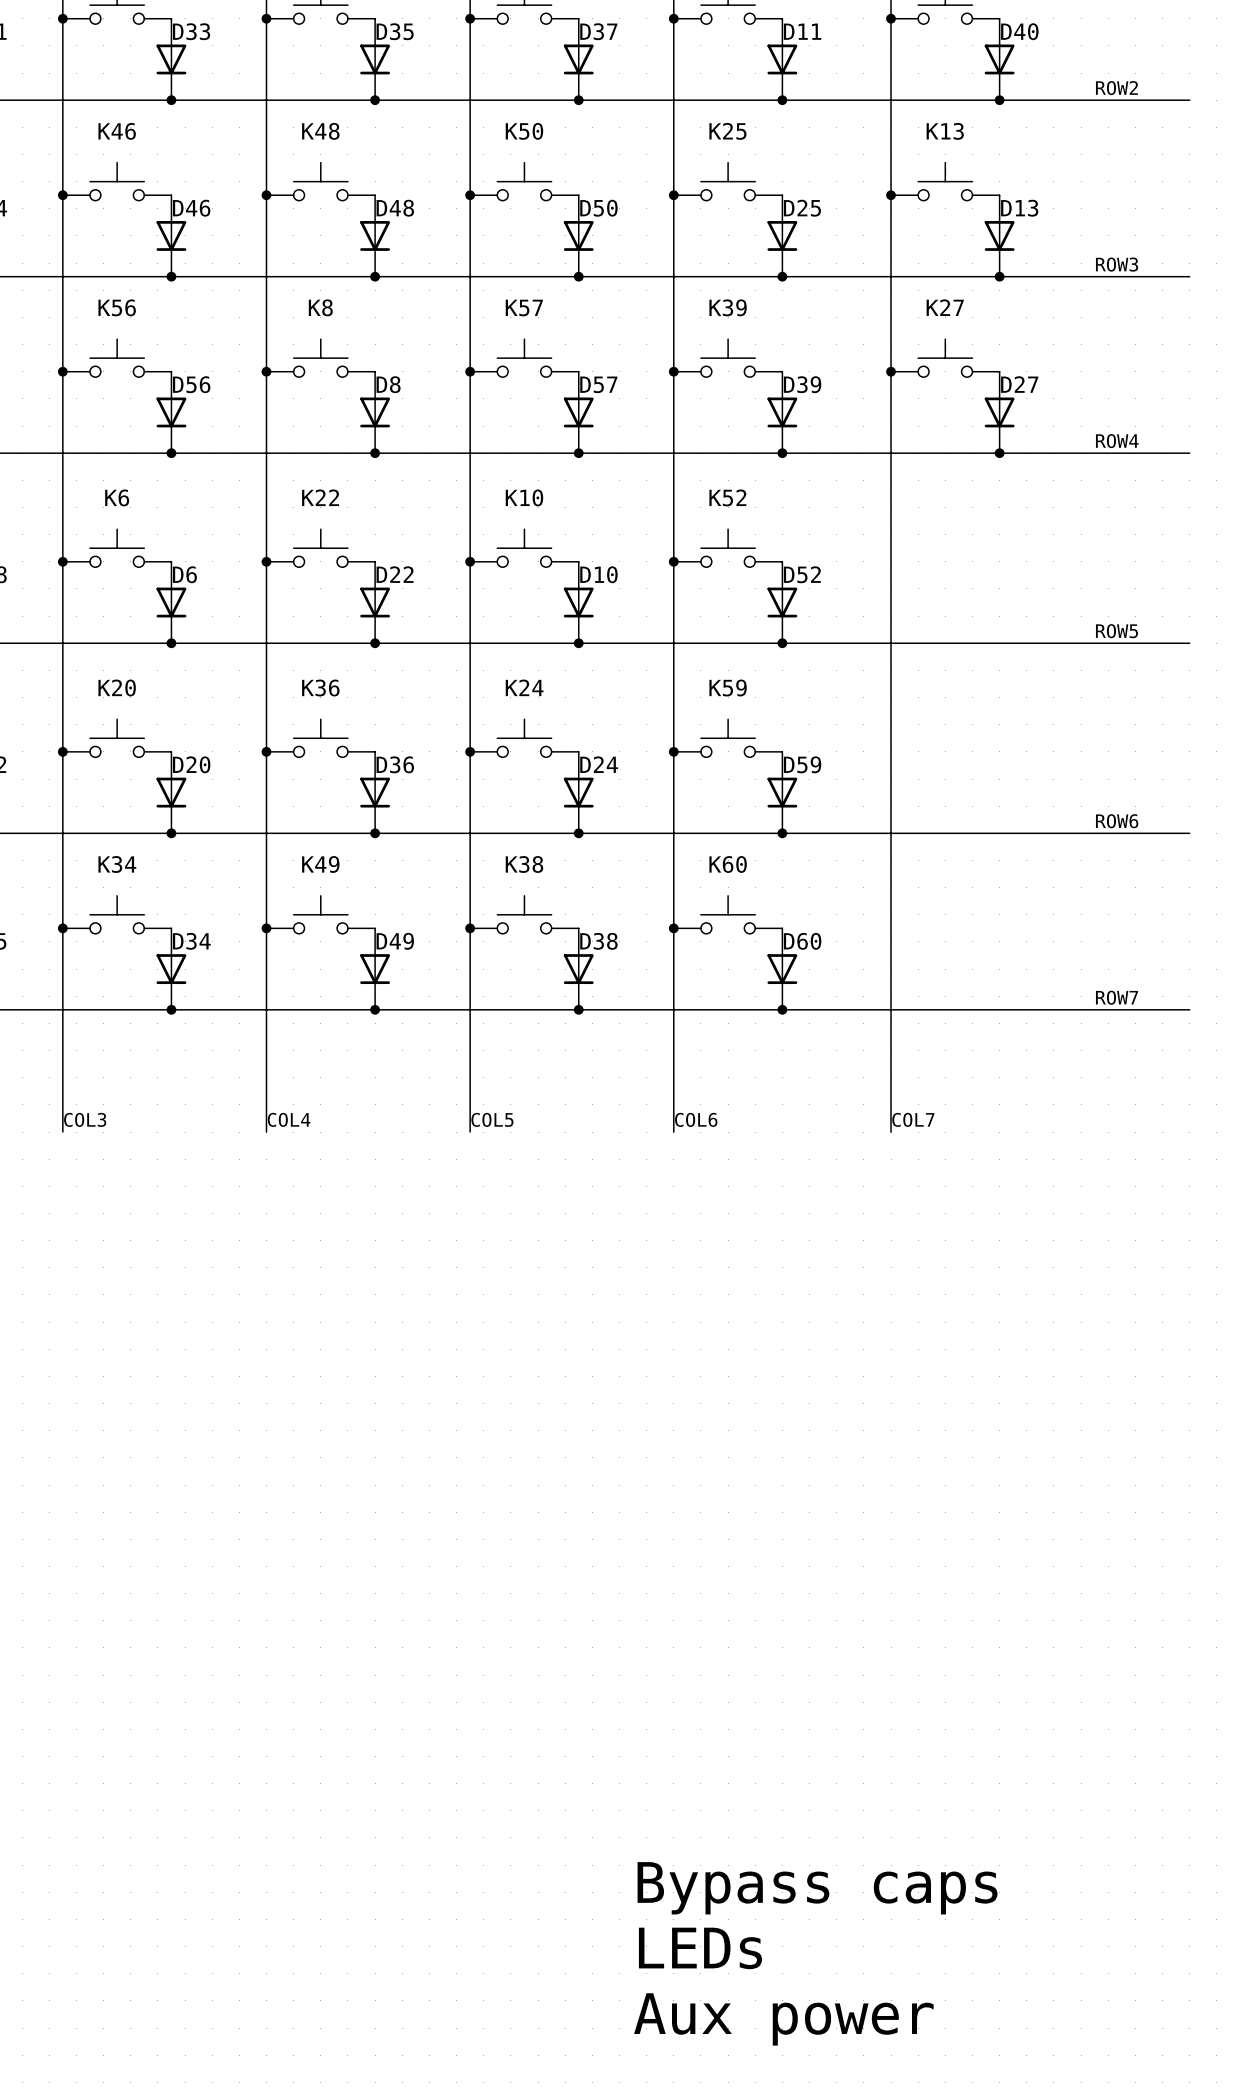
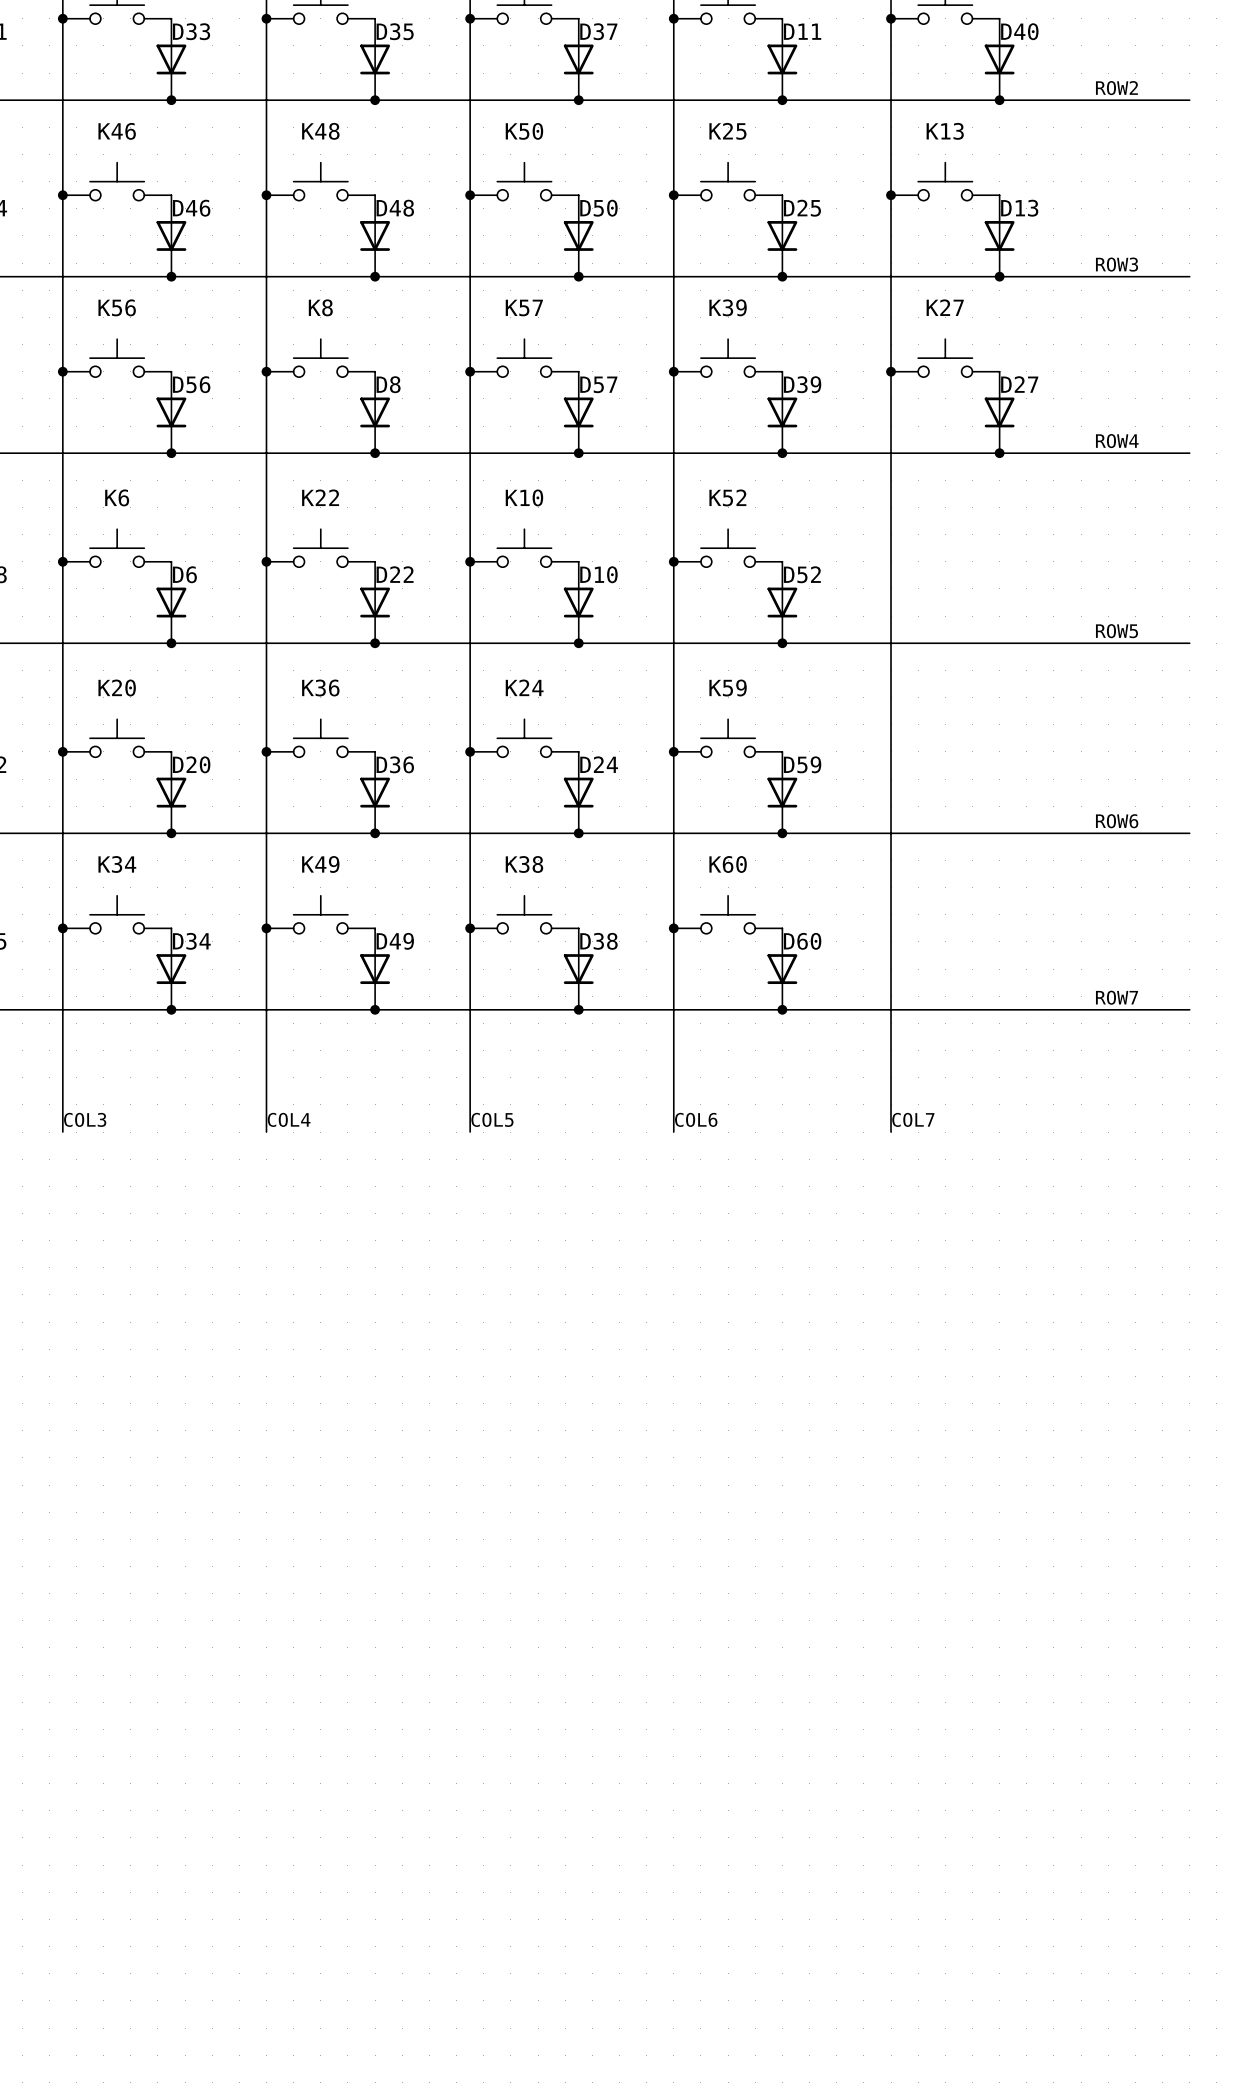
text: Bypass caps (817, 1888) -> none
text: LEDs (700, 1948) -> none
text: Aux power (783, 2019) -> none

